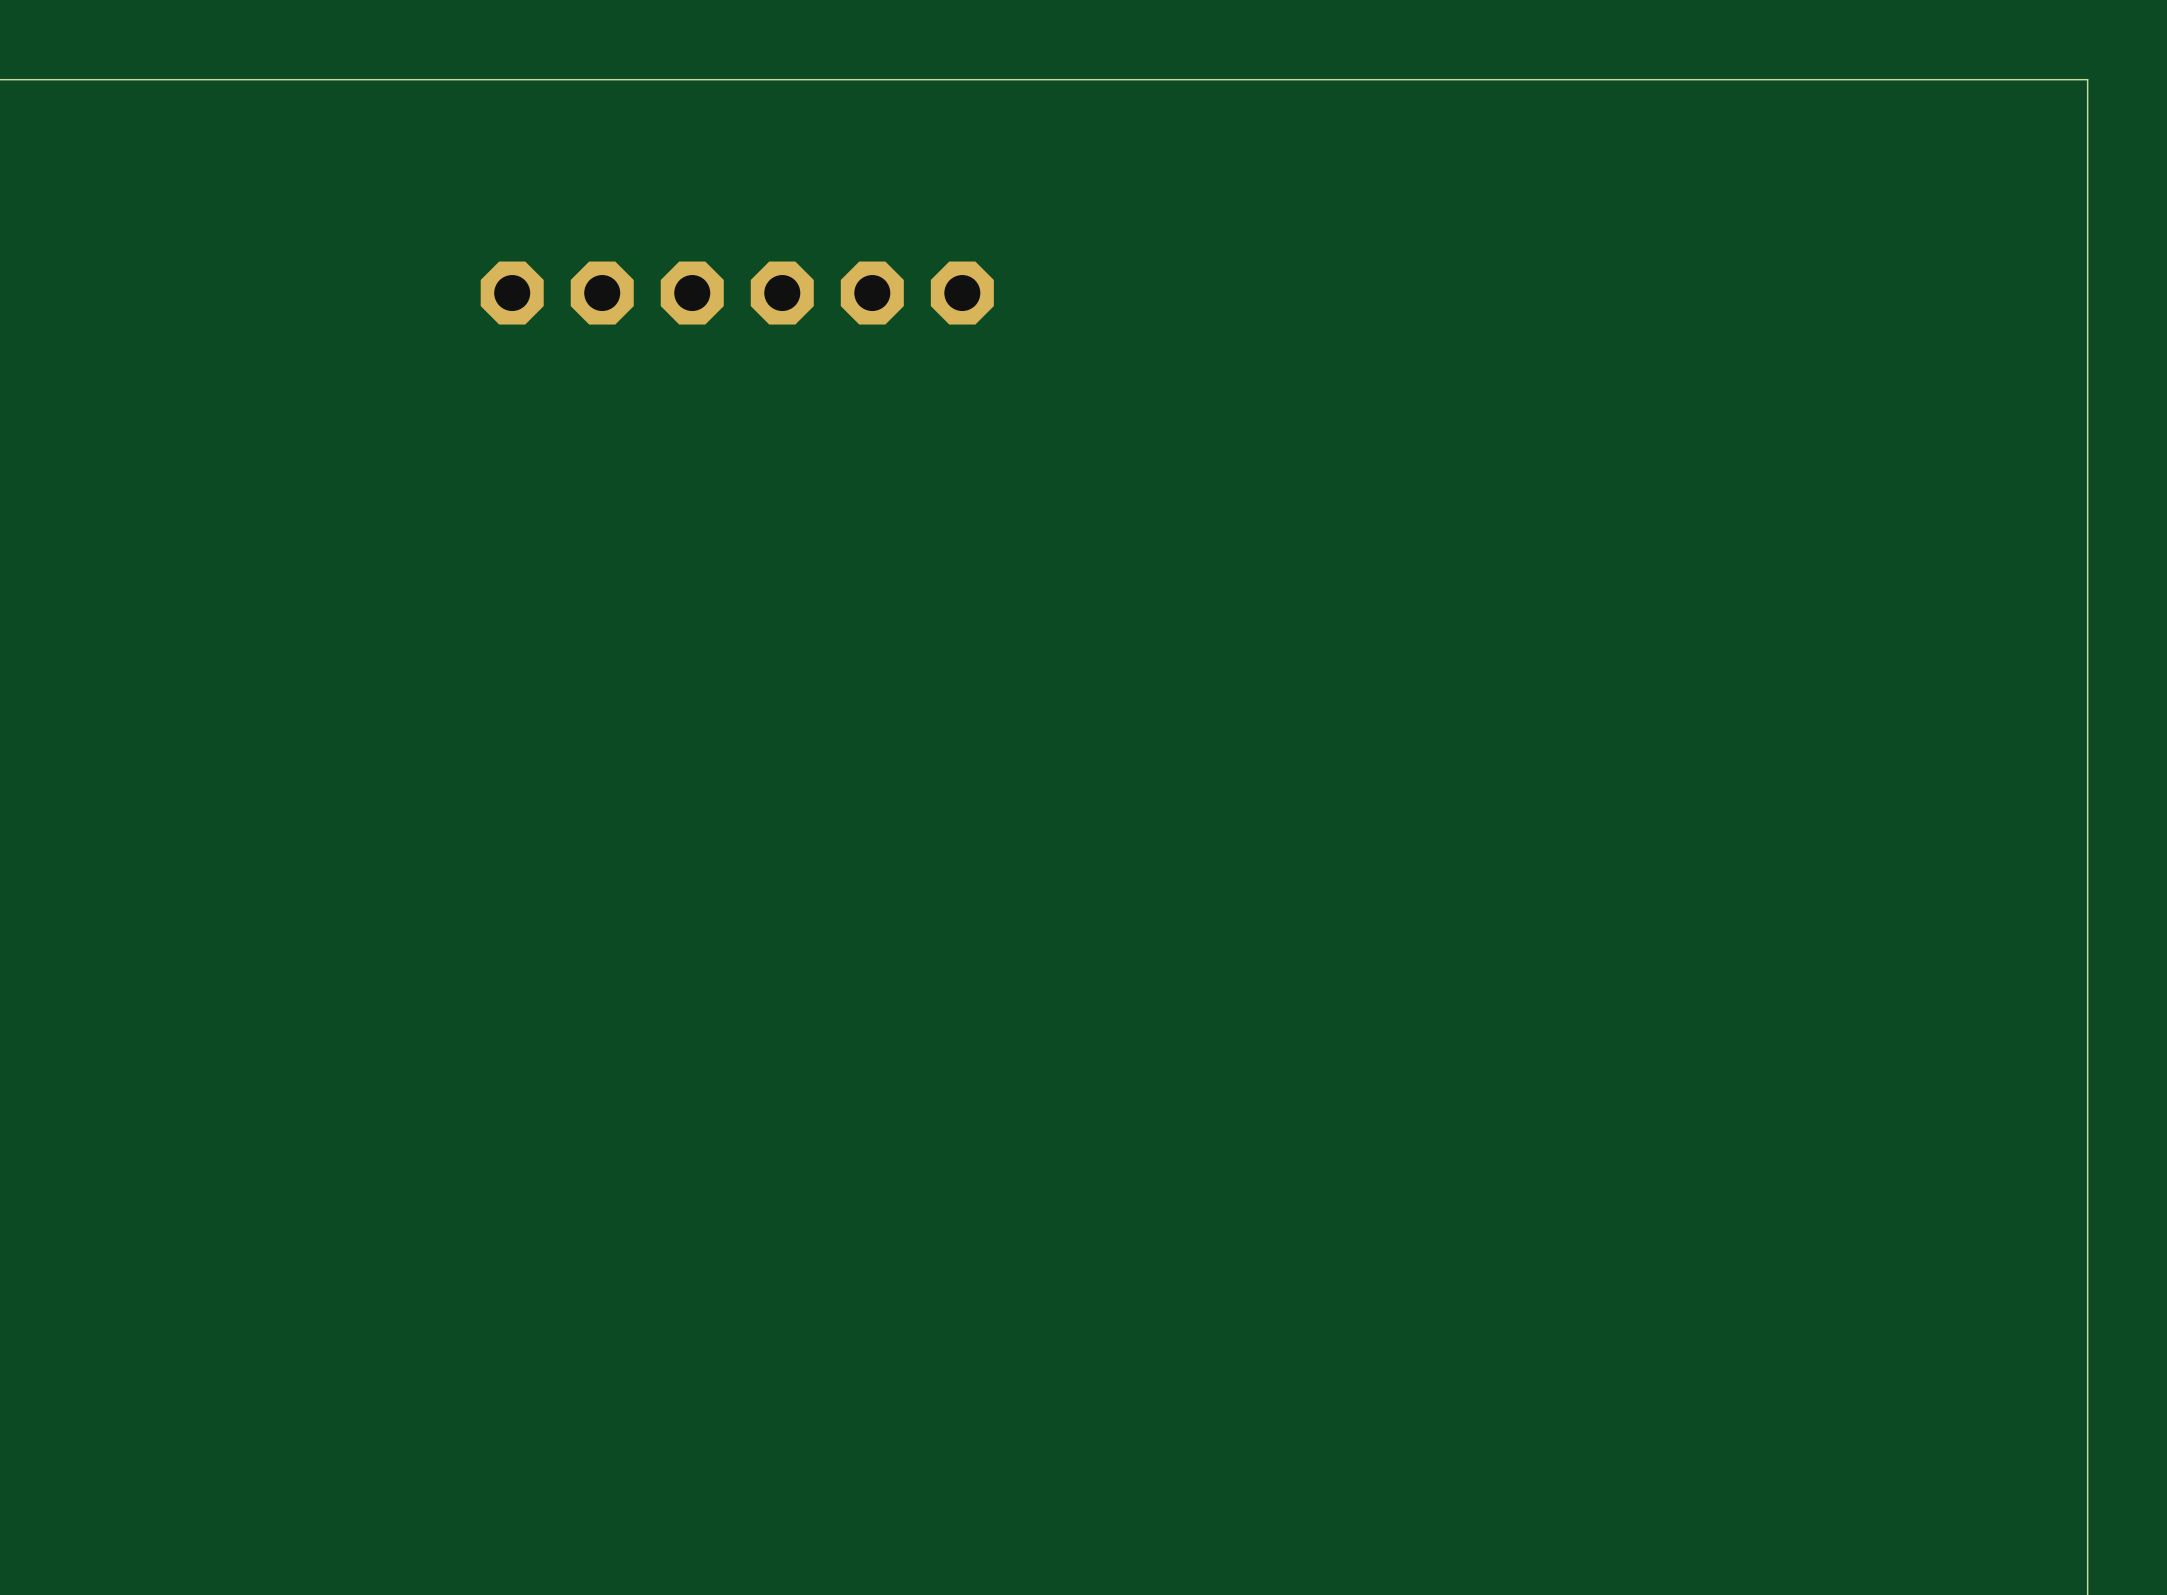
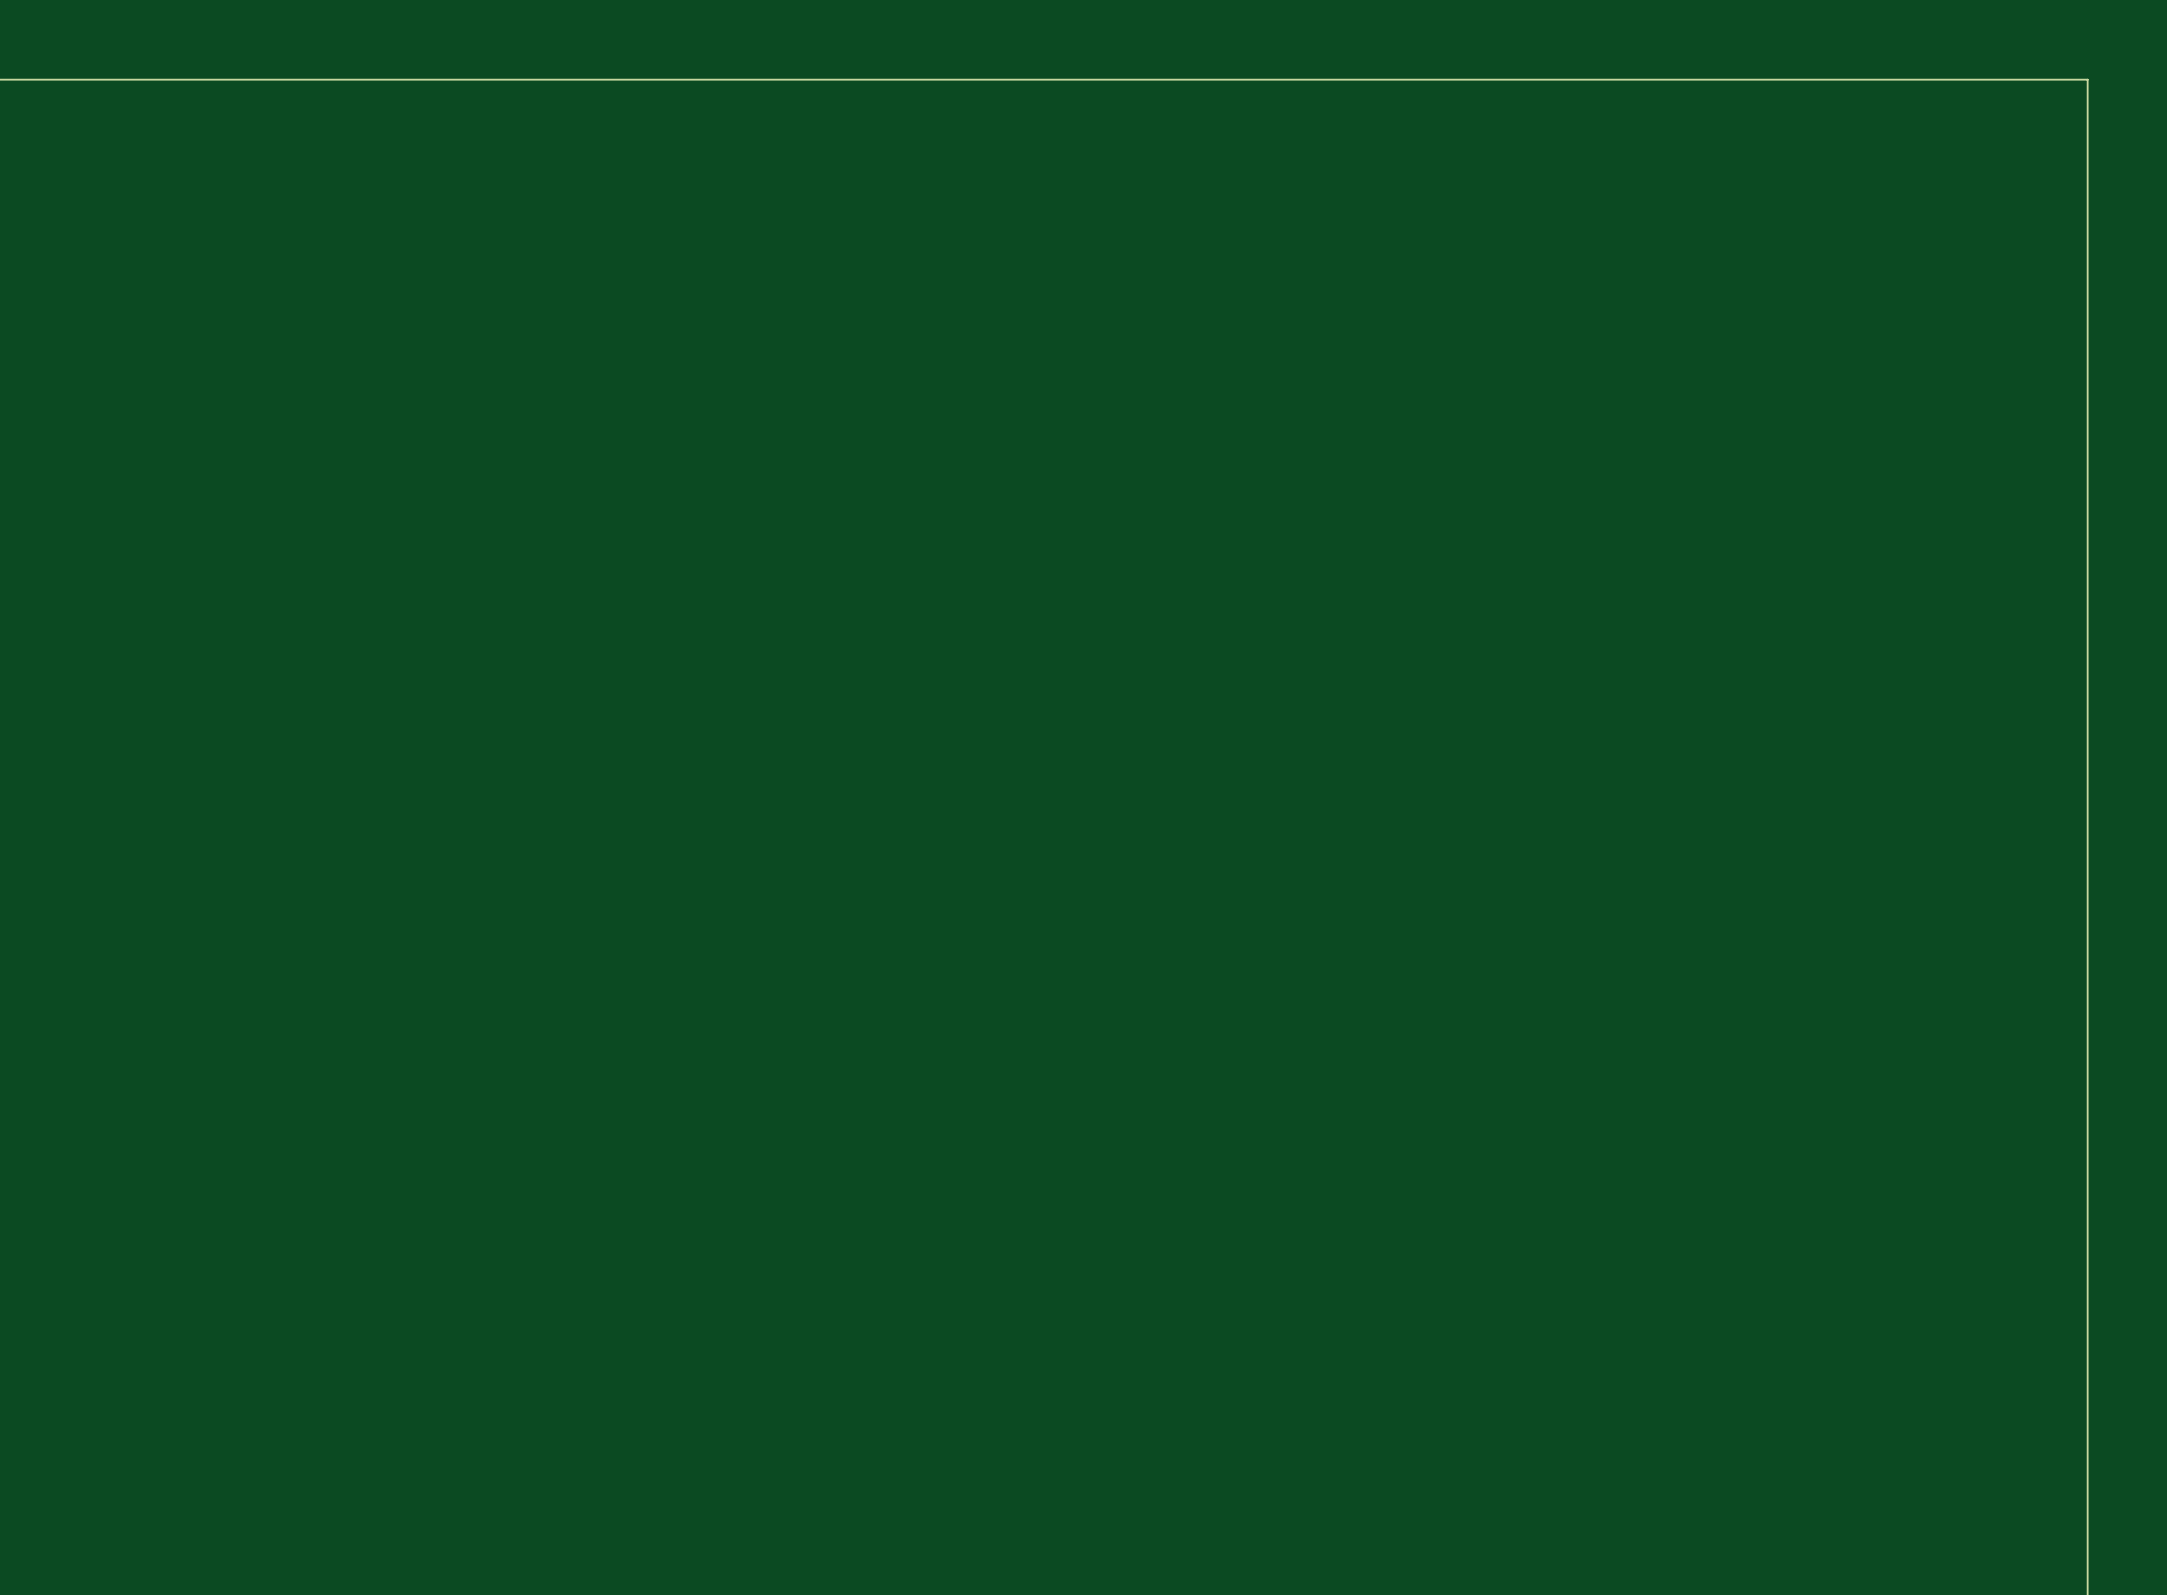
part: (737, 293) -> none

